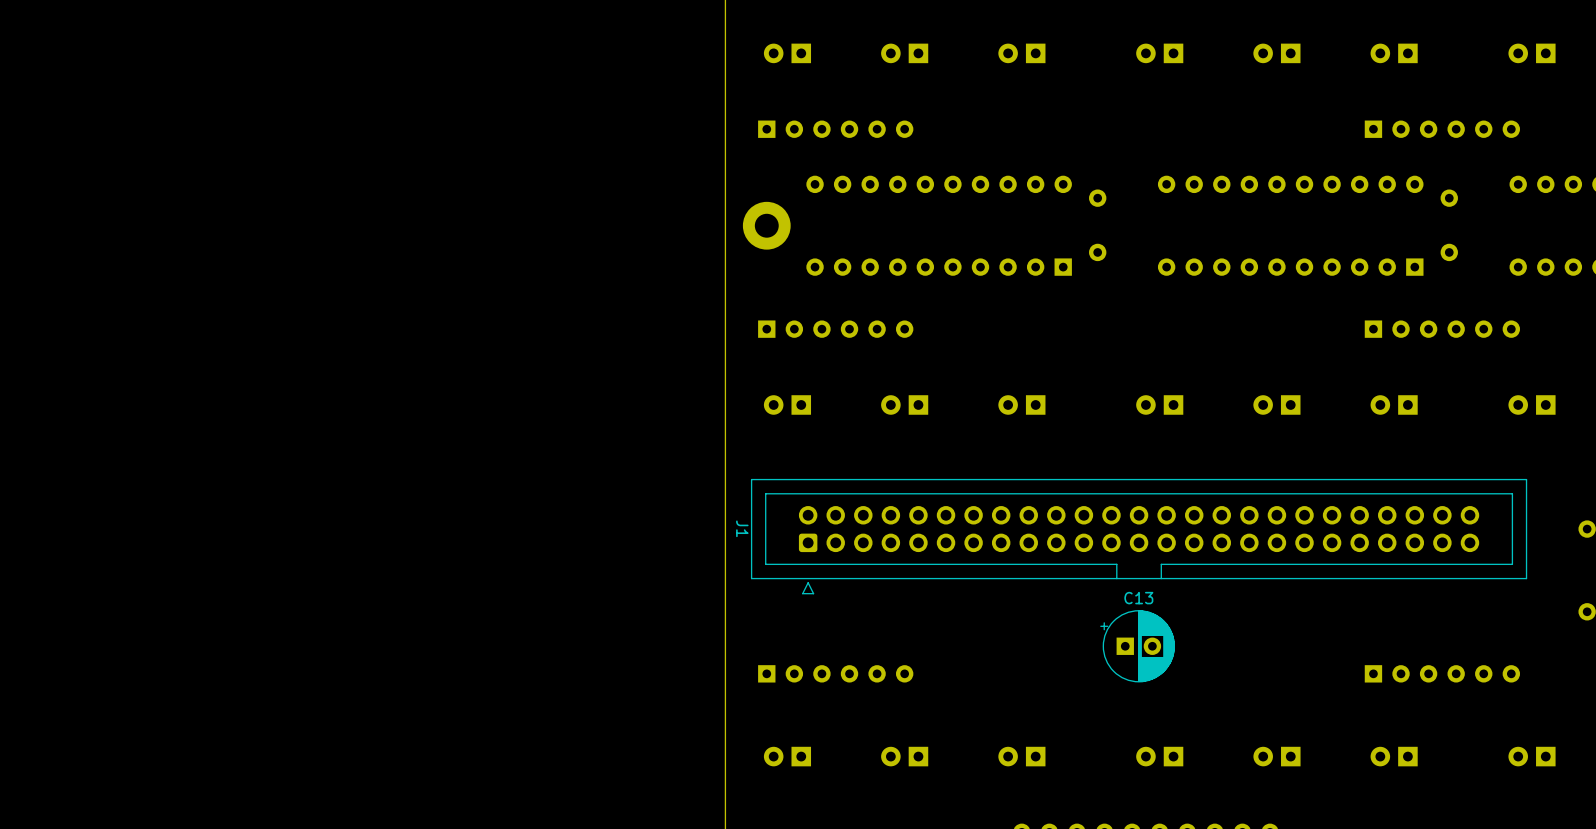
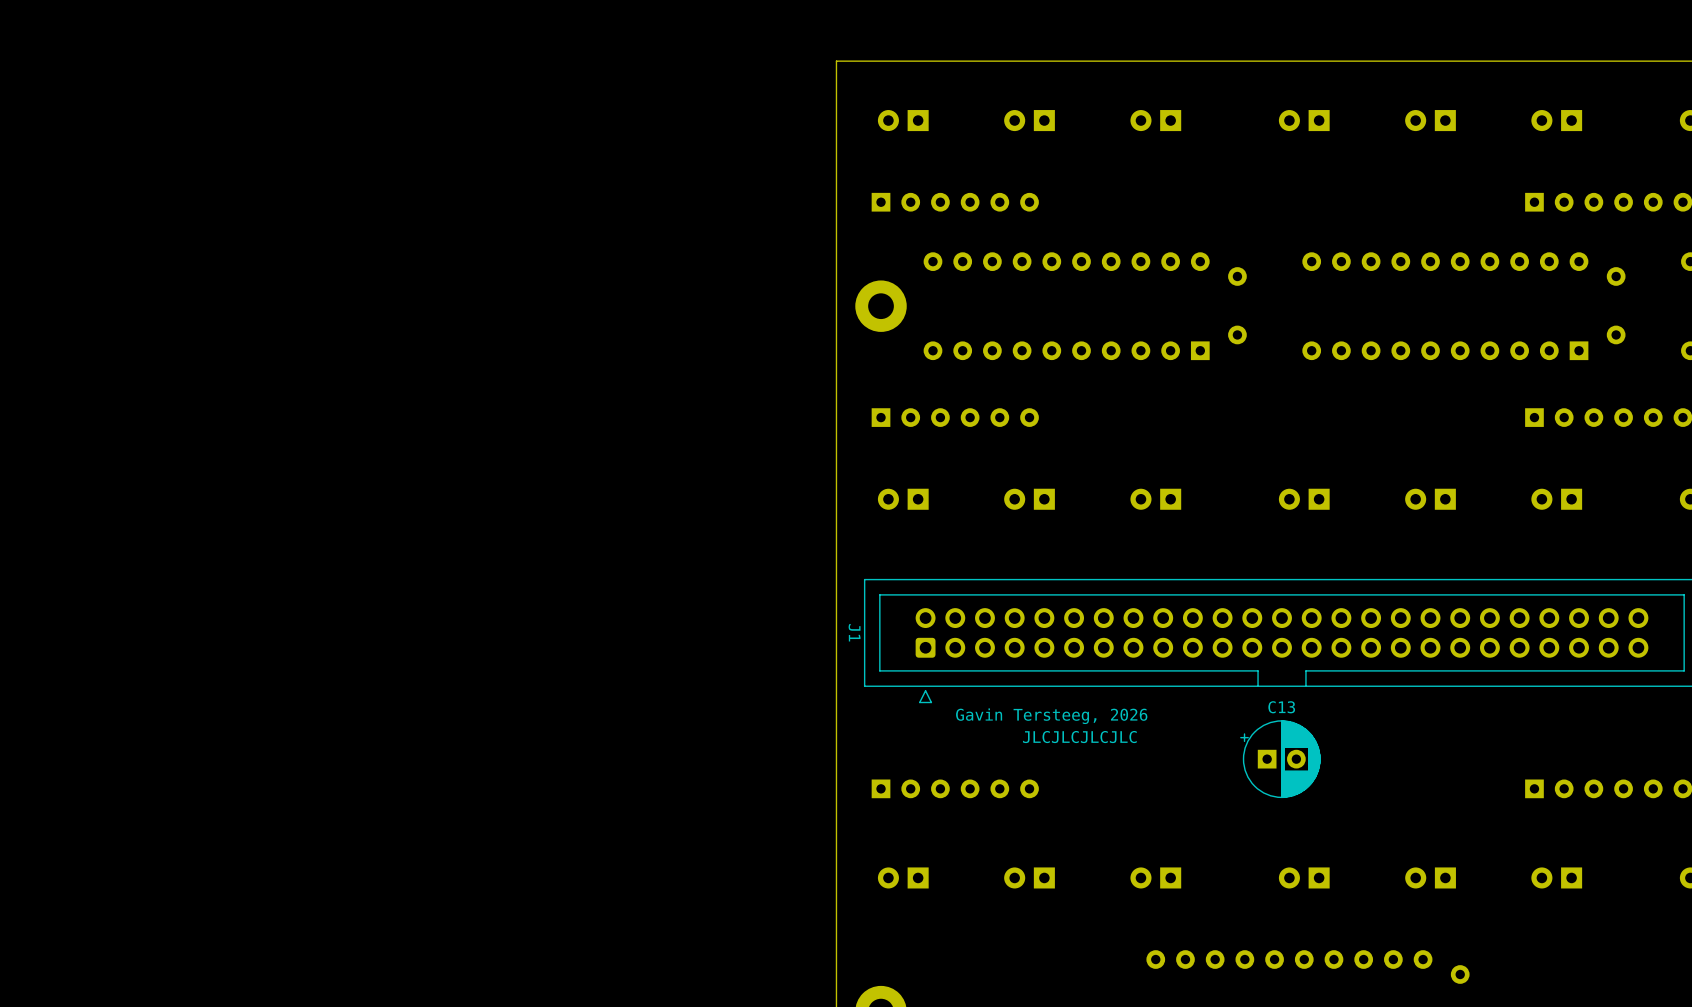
text: none -> Gavin Tersteeg, 2026 (1051, 716)
text: none -> JLCJLCJLCJLC (1079, 737)

